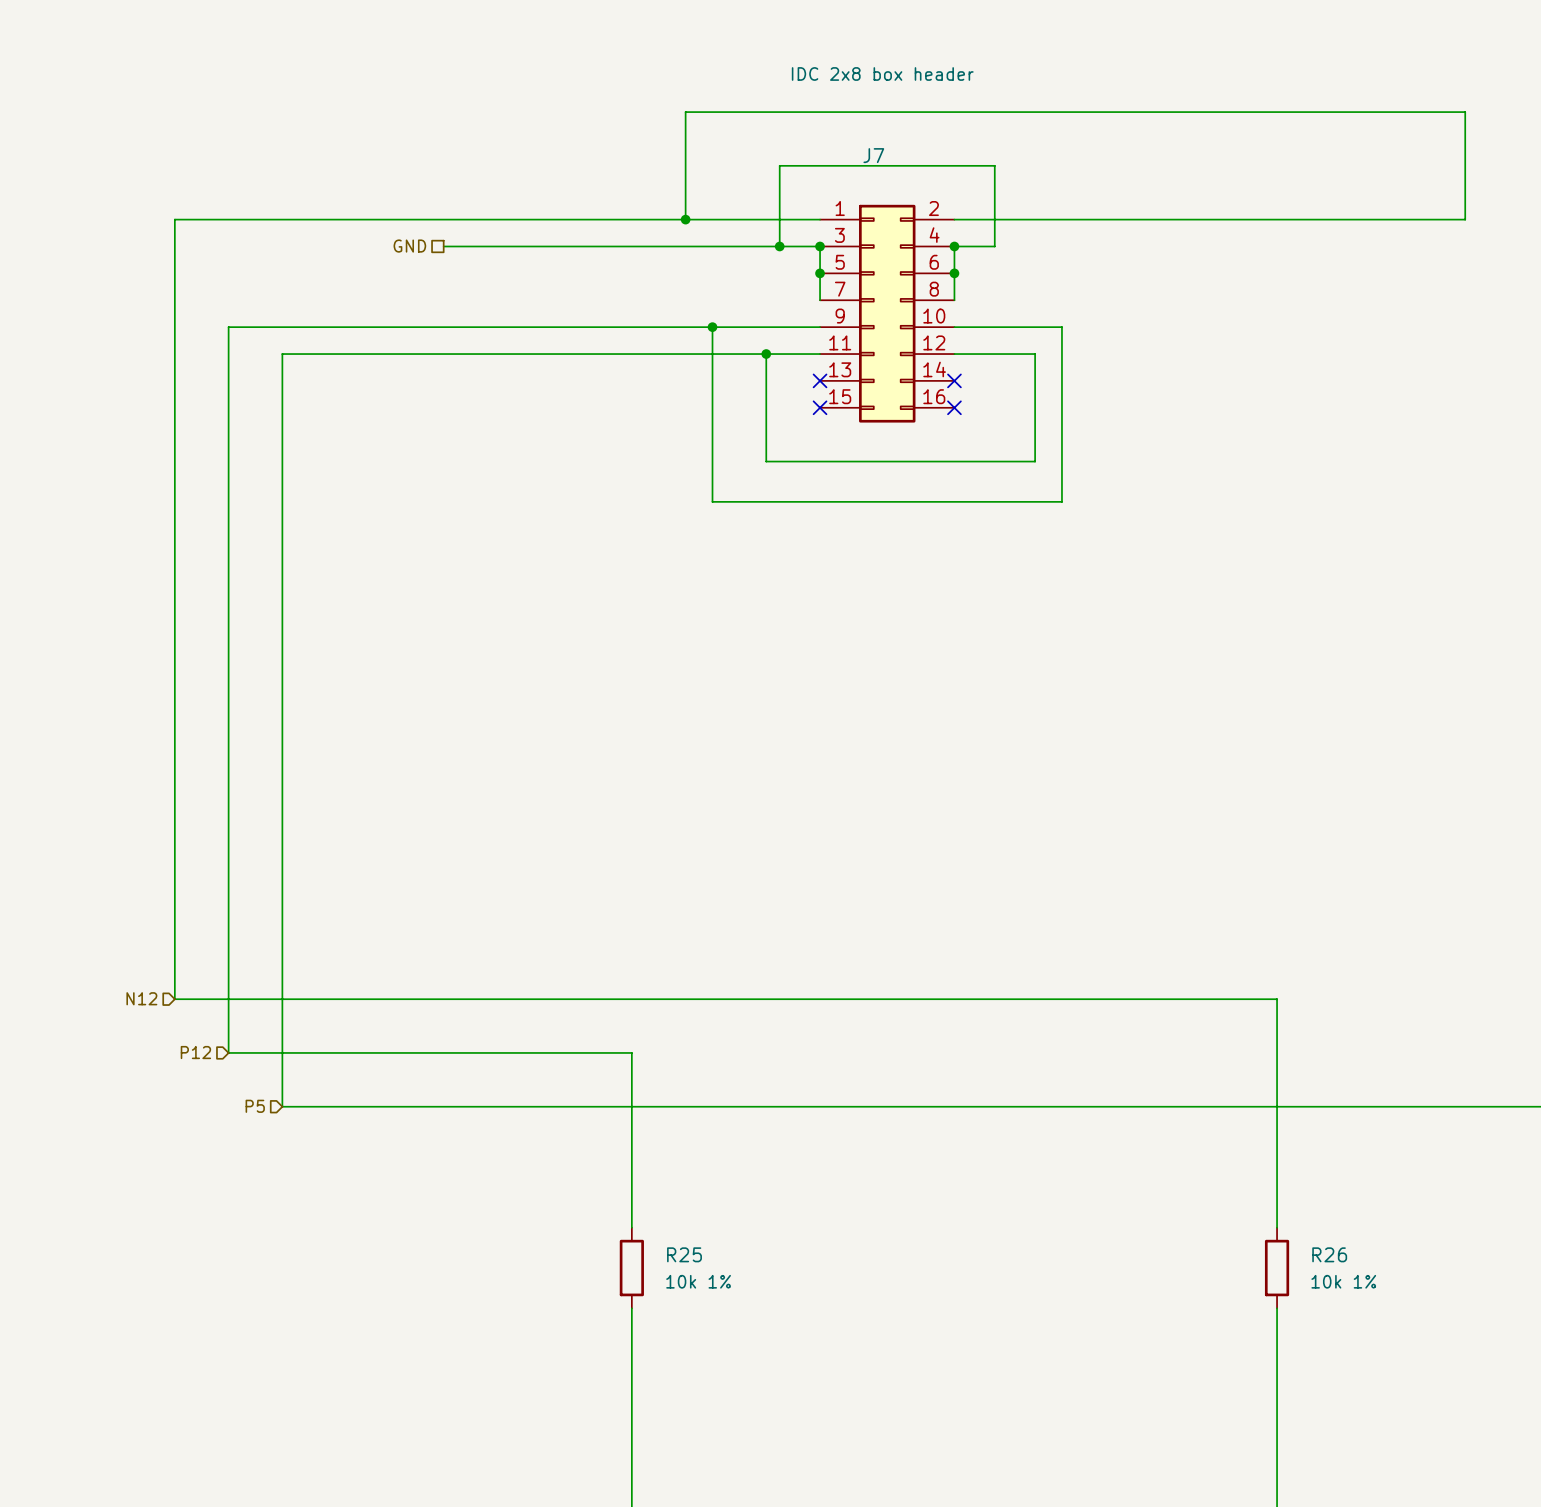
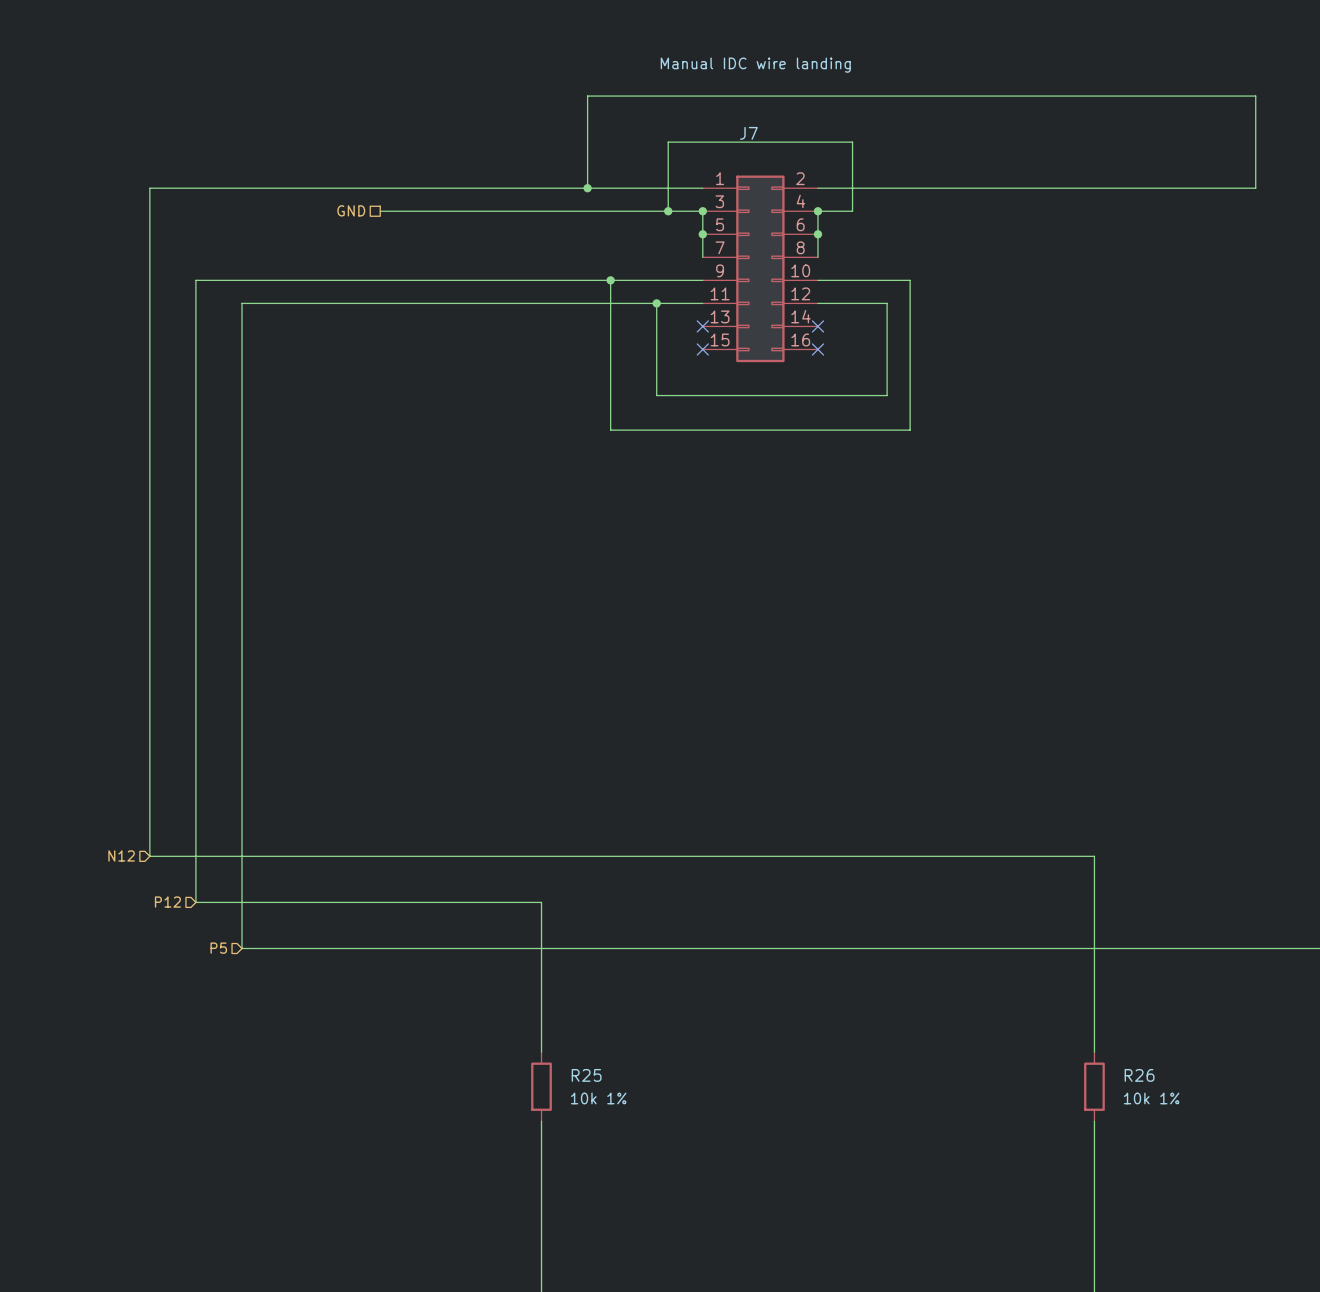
J7 value: IDC 2x8 box header (882, 73) -> Manual IDC wire landing (755, 65)

